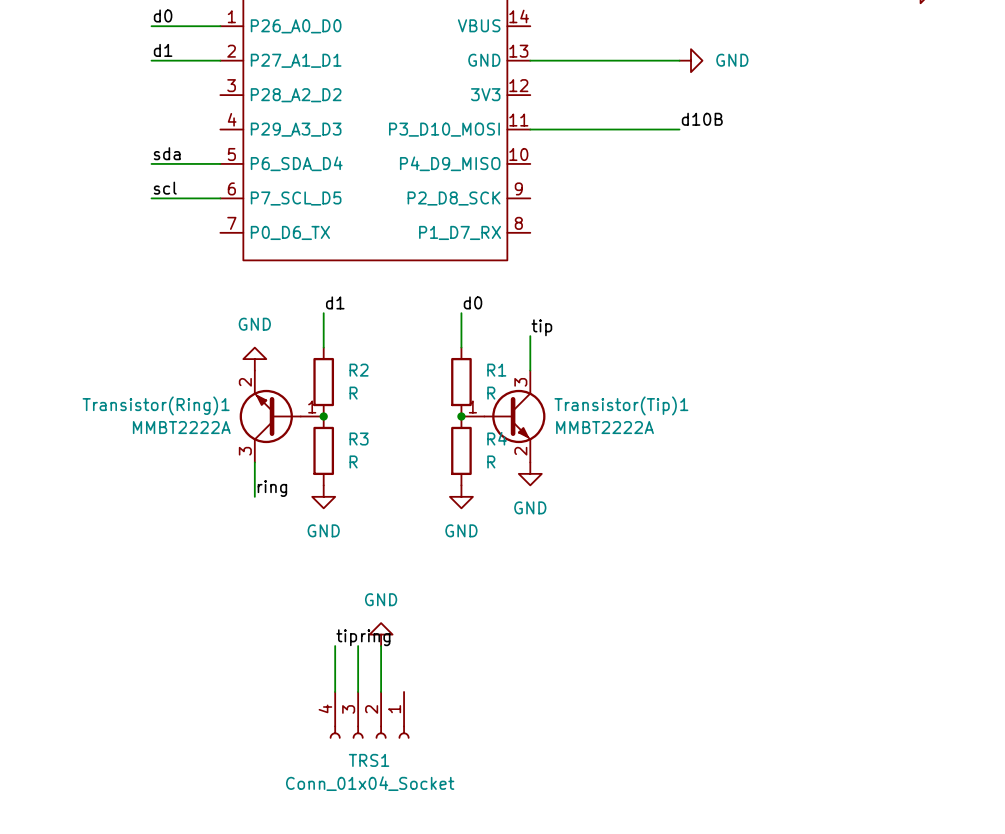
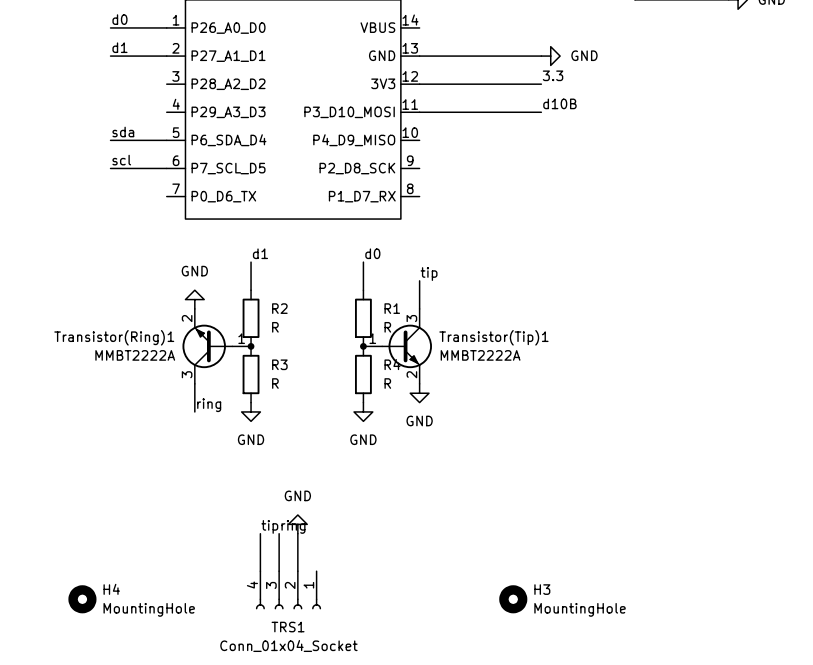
label: none -> 3.3 (553, 75)
wire: none -> (419, 84) (541, 84)
H4: none -> MountingHole (82, 599)
H3: none -> MountingHole (513, 599)

